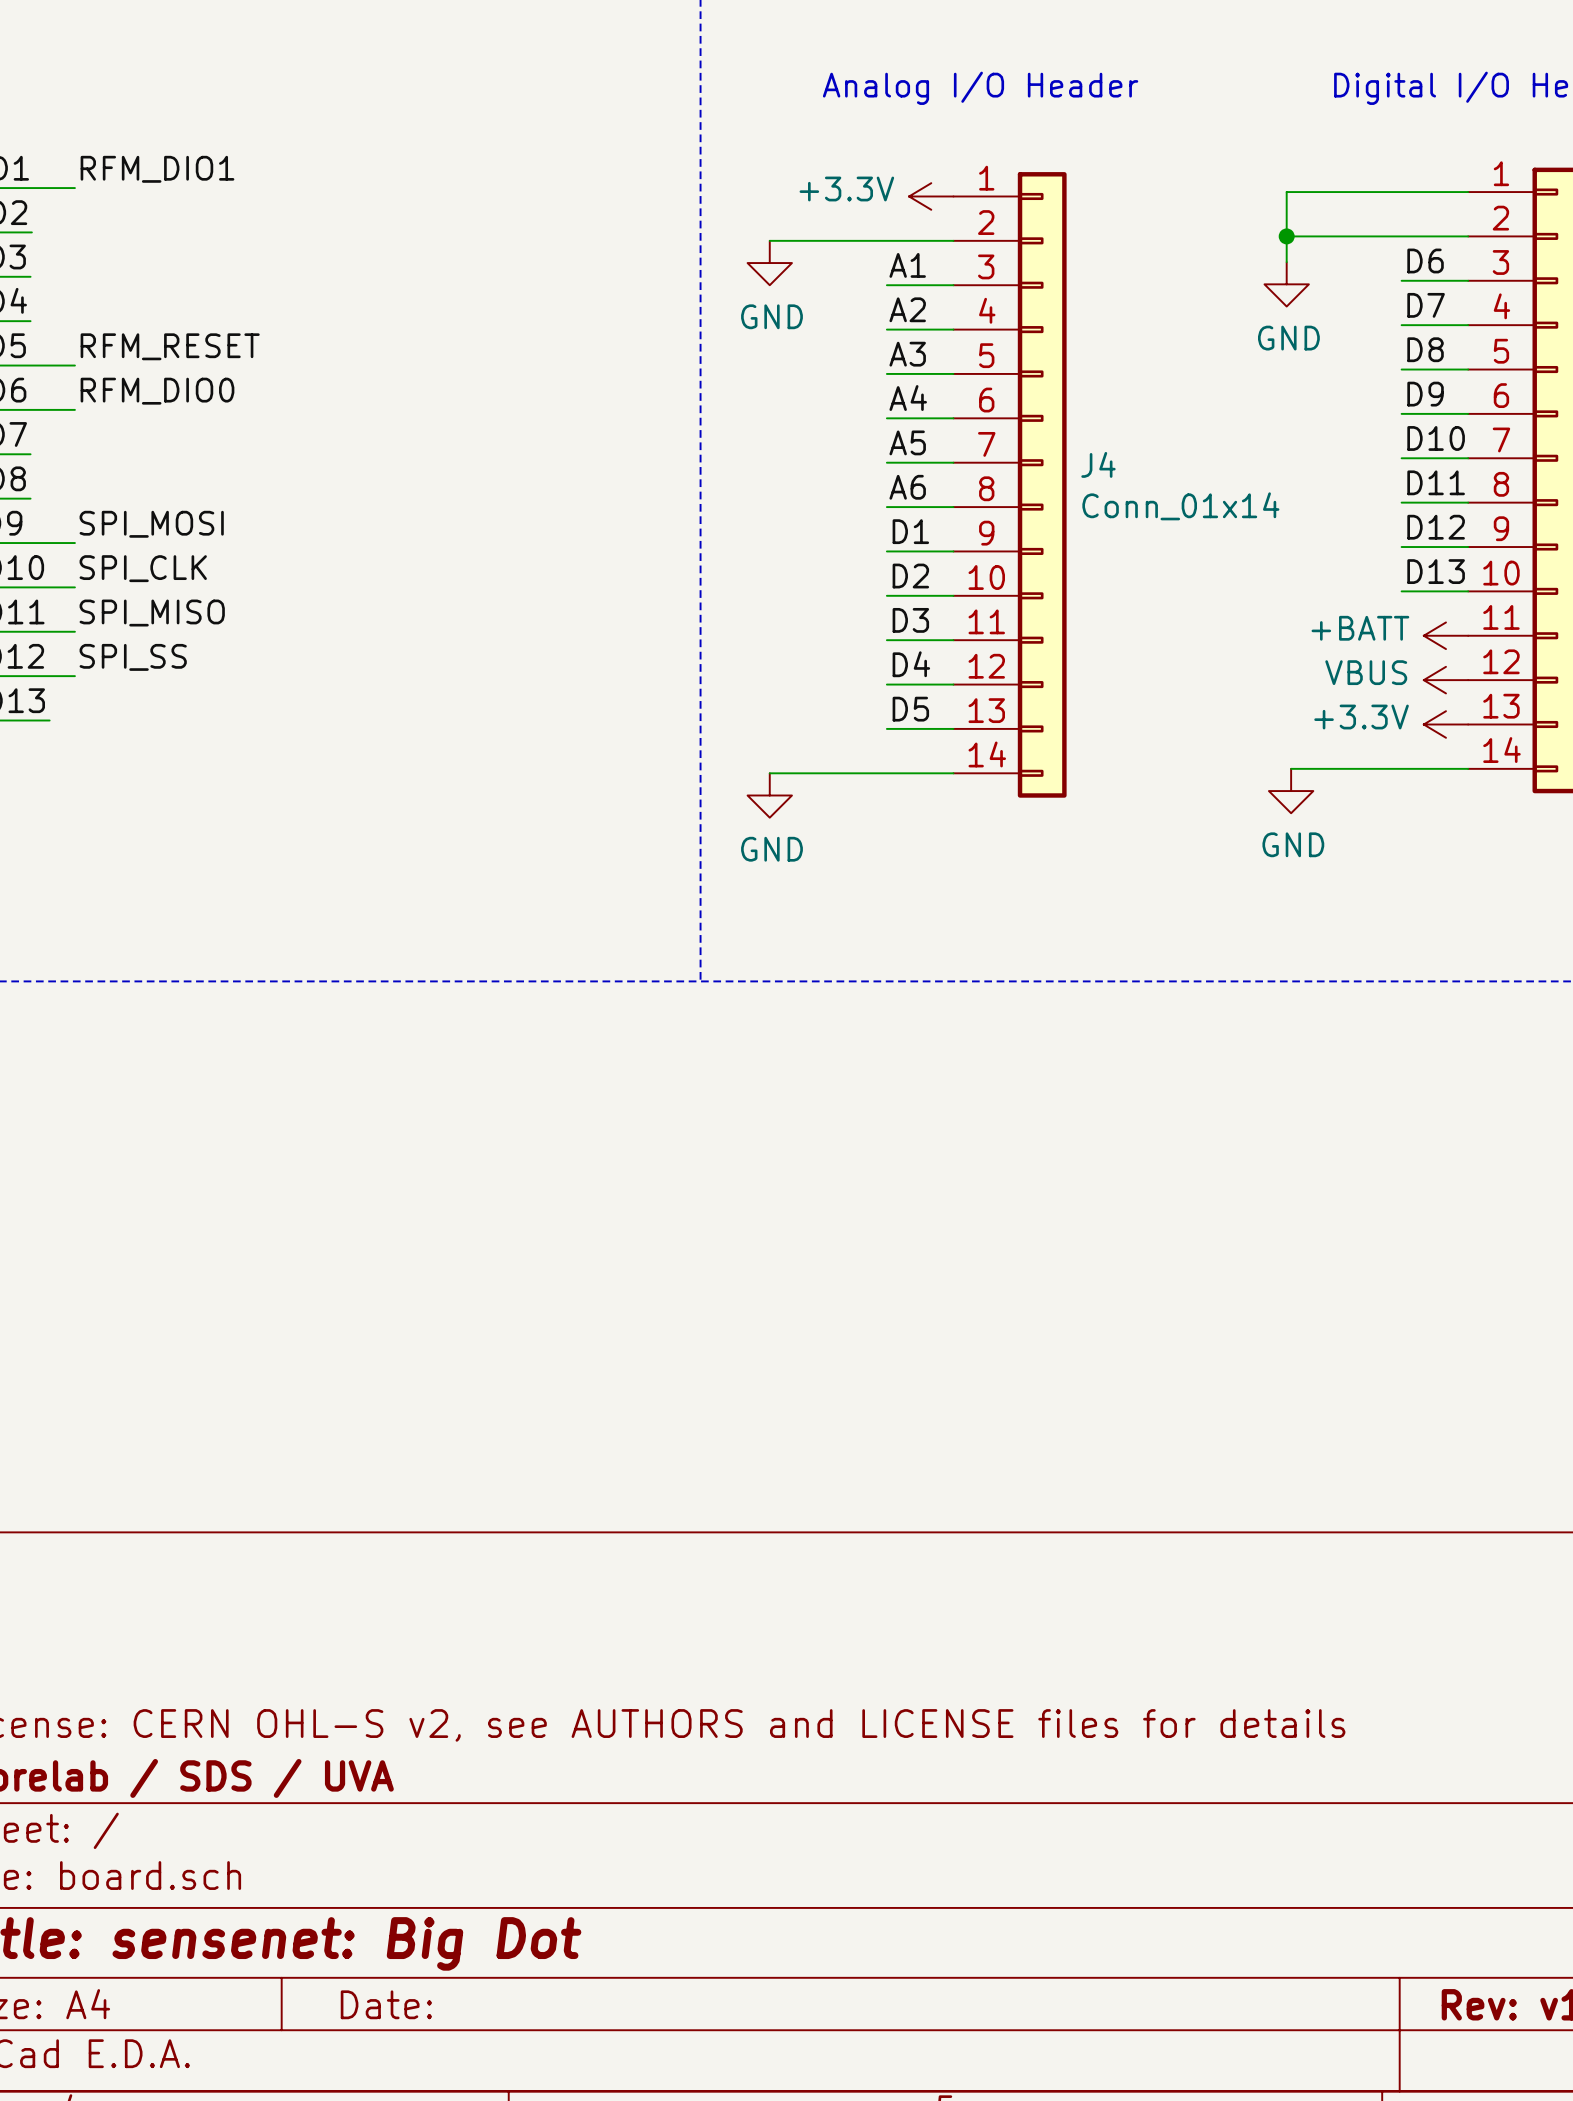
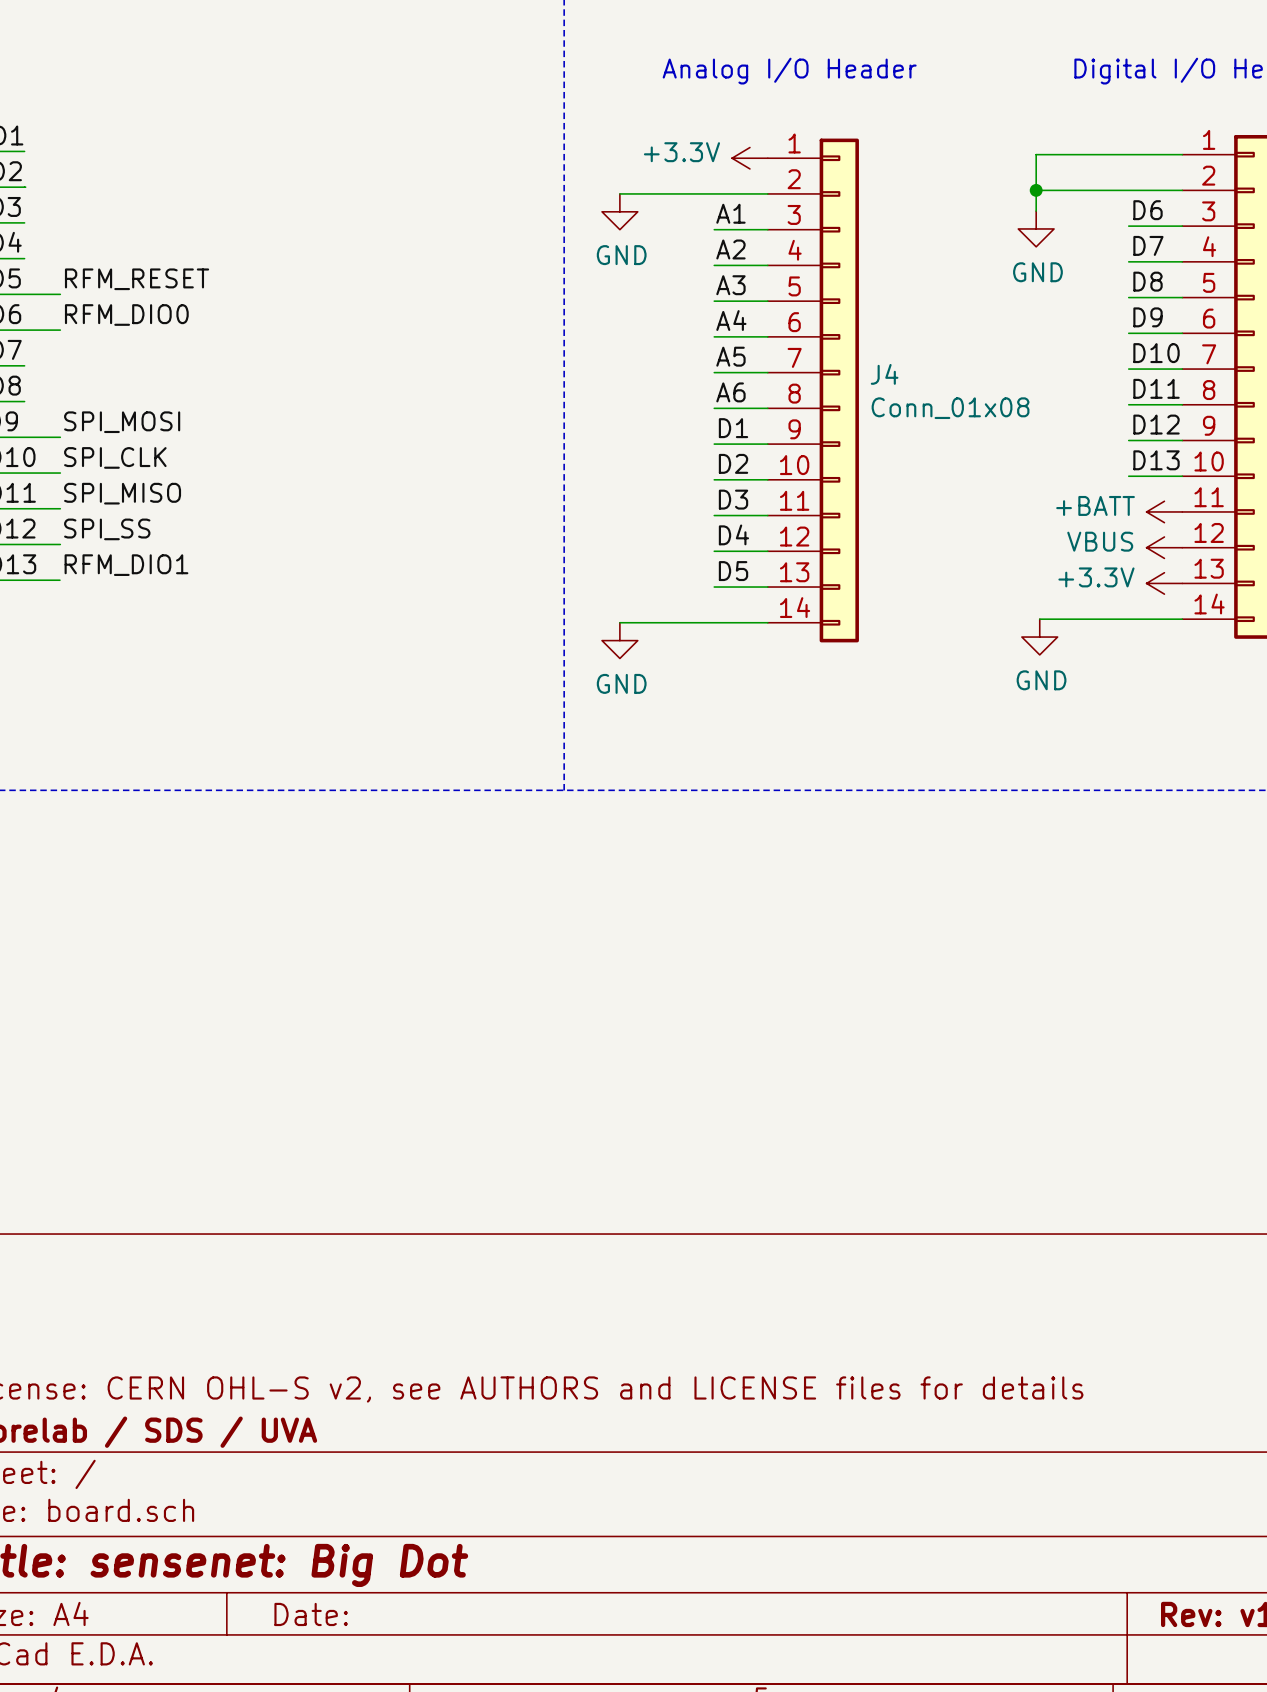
label: RFM_DIO1 (157, 169) -> none
wire: (30, 188) (74, 188) -> none
J4 value: Conn_01x14 (1180, 506) -> Conn_01x08 (950, 408)
label: none -> RFM_DIO1 (126, 565)
wire: none -> (39, 580) (59, 580)

